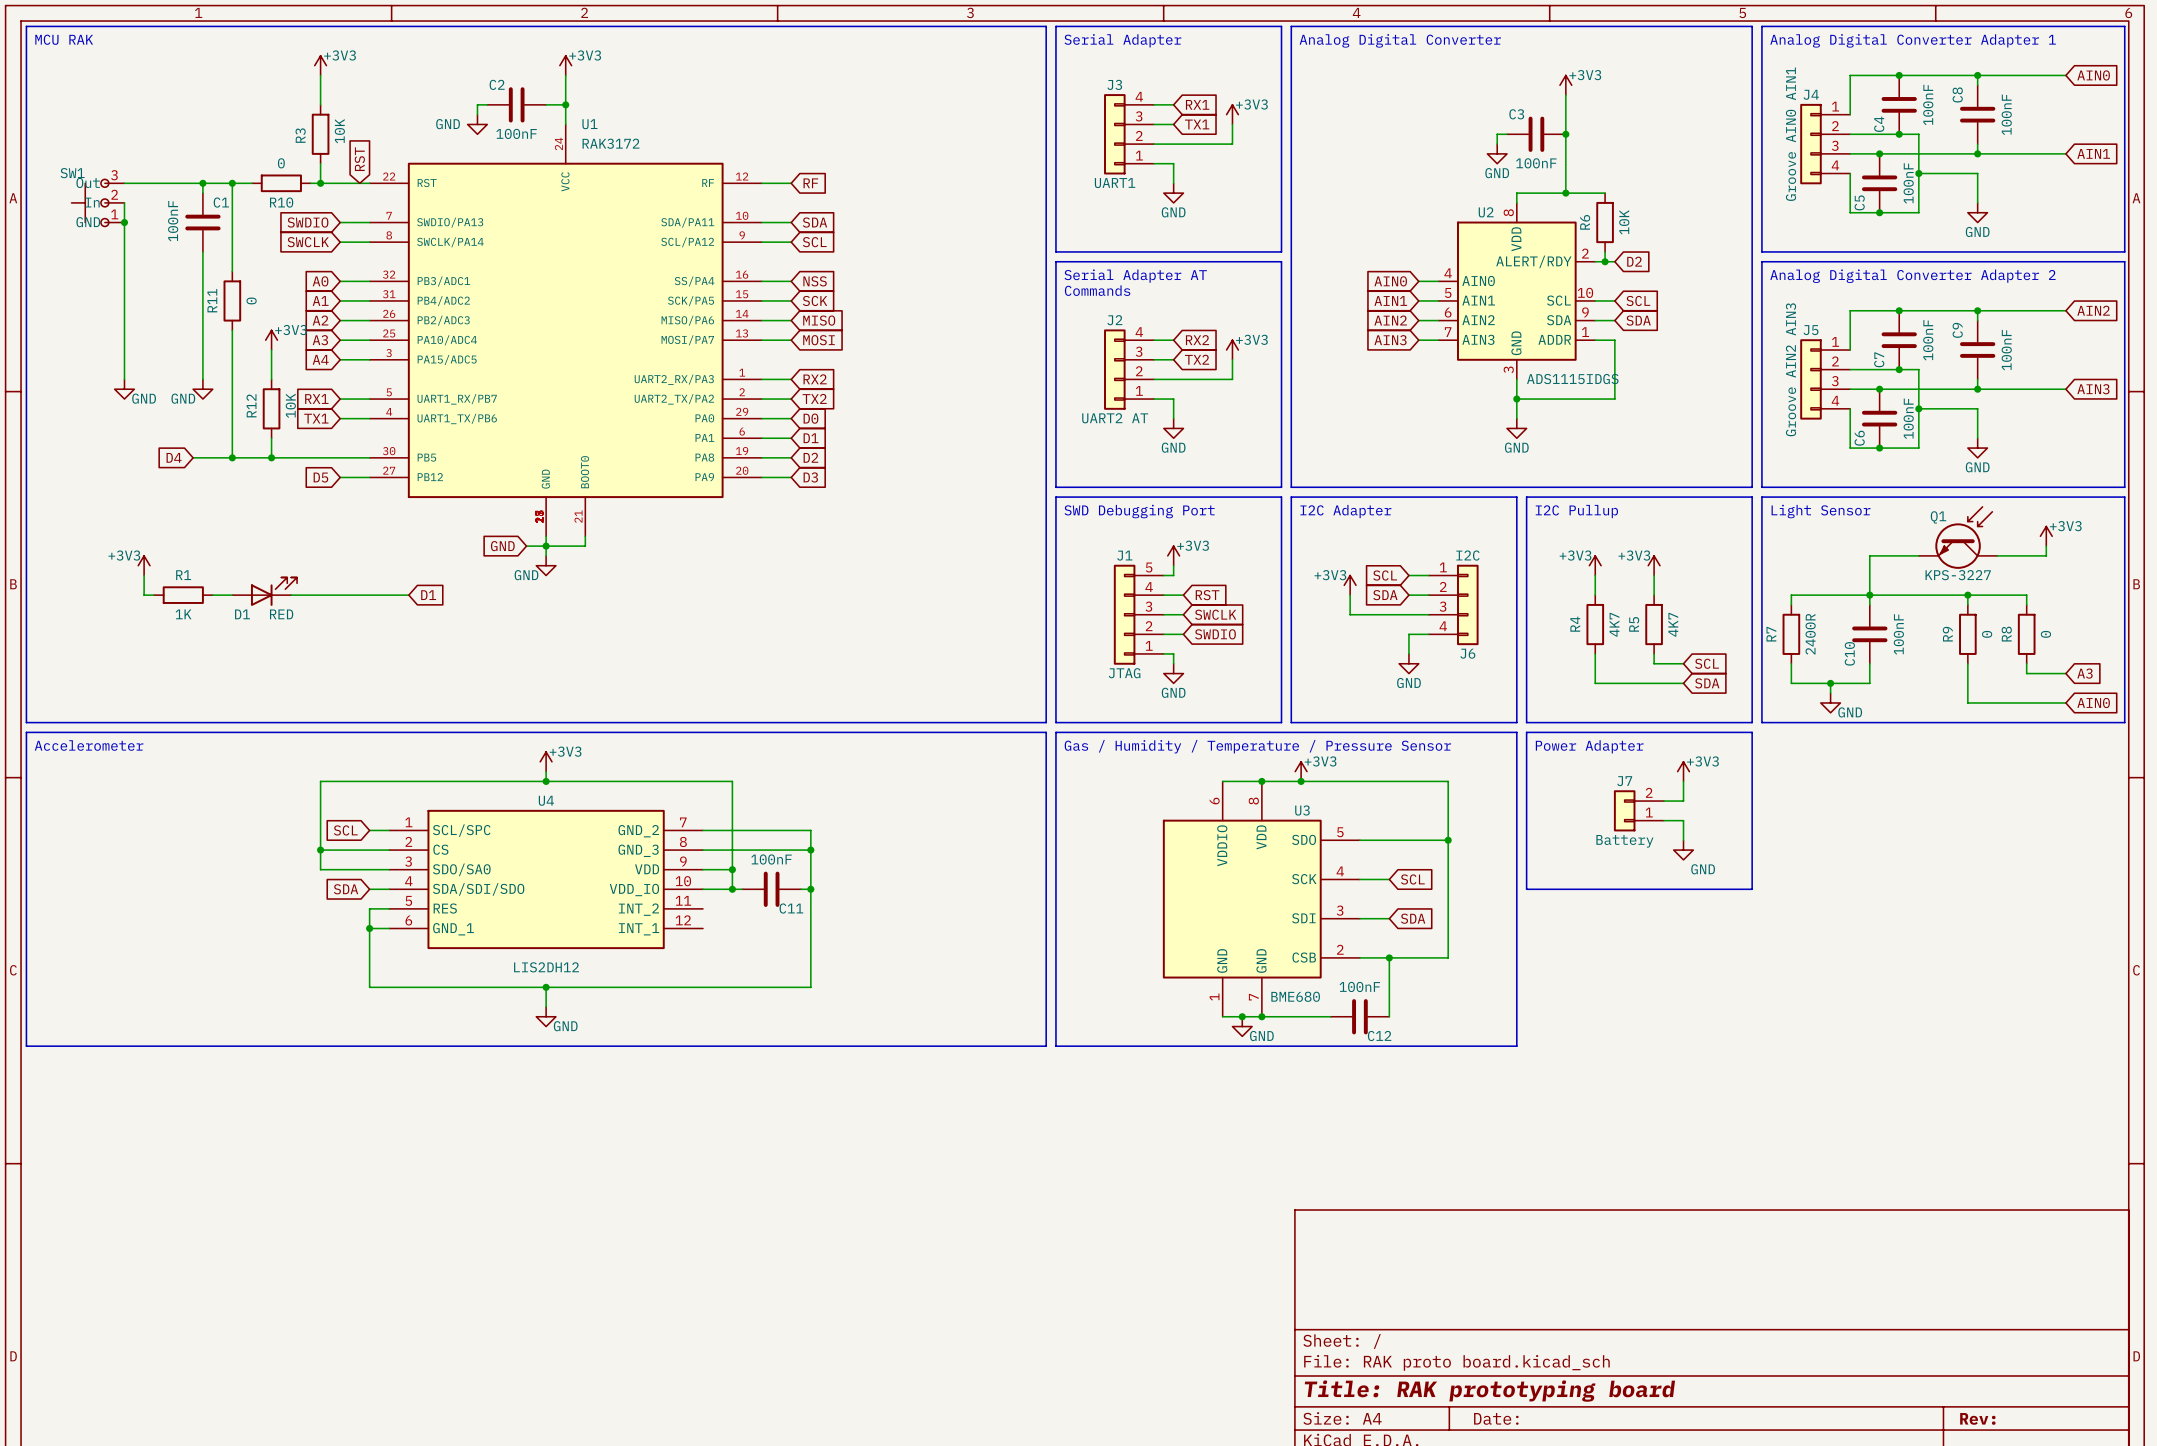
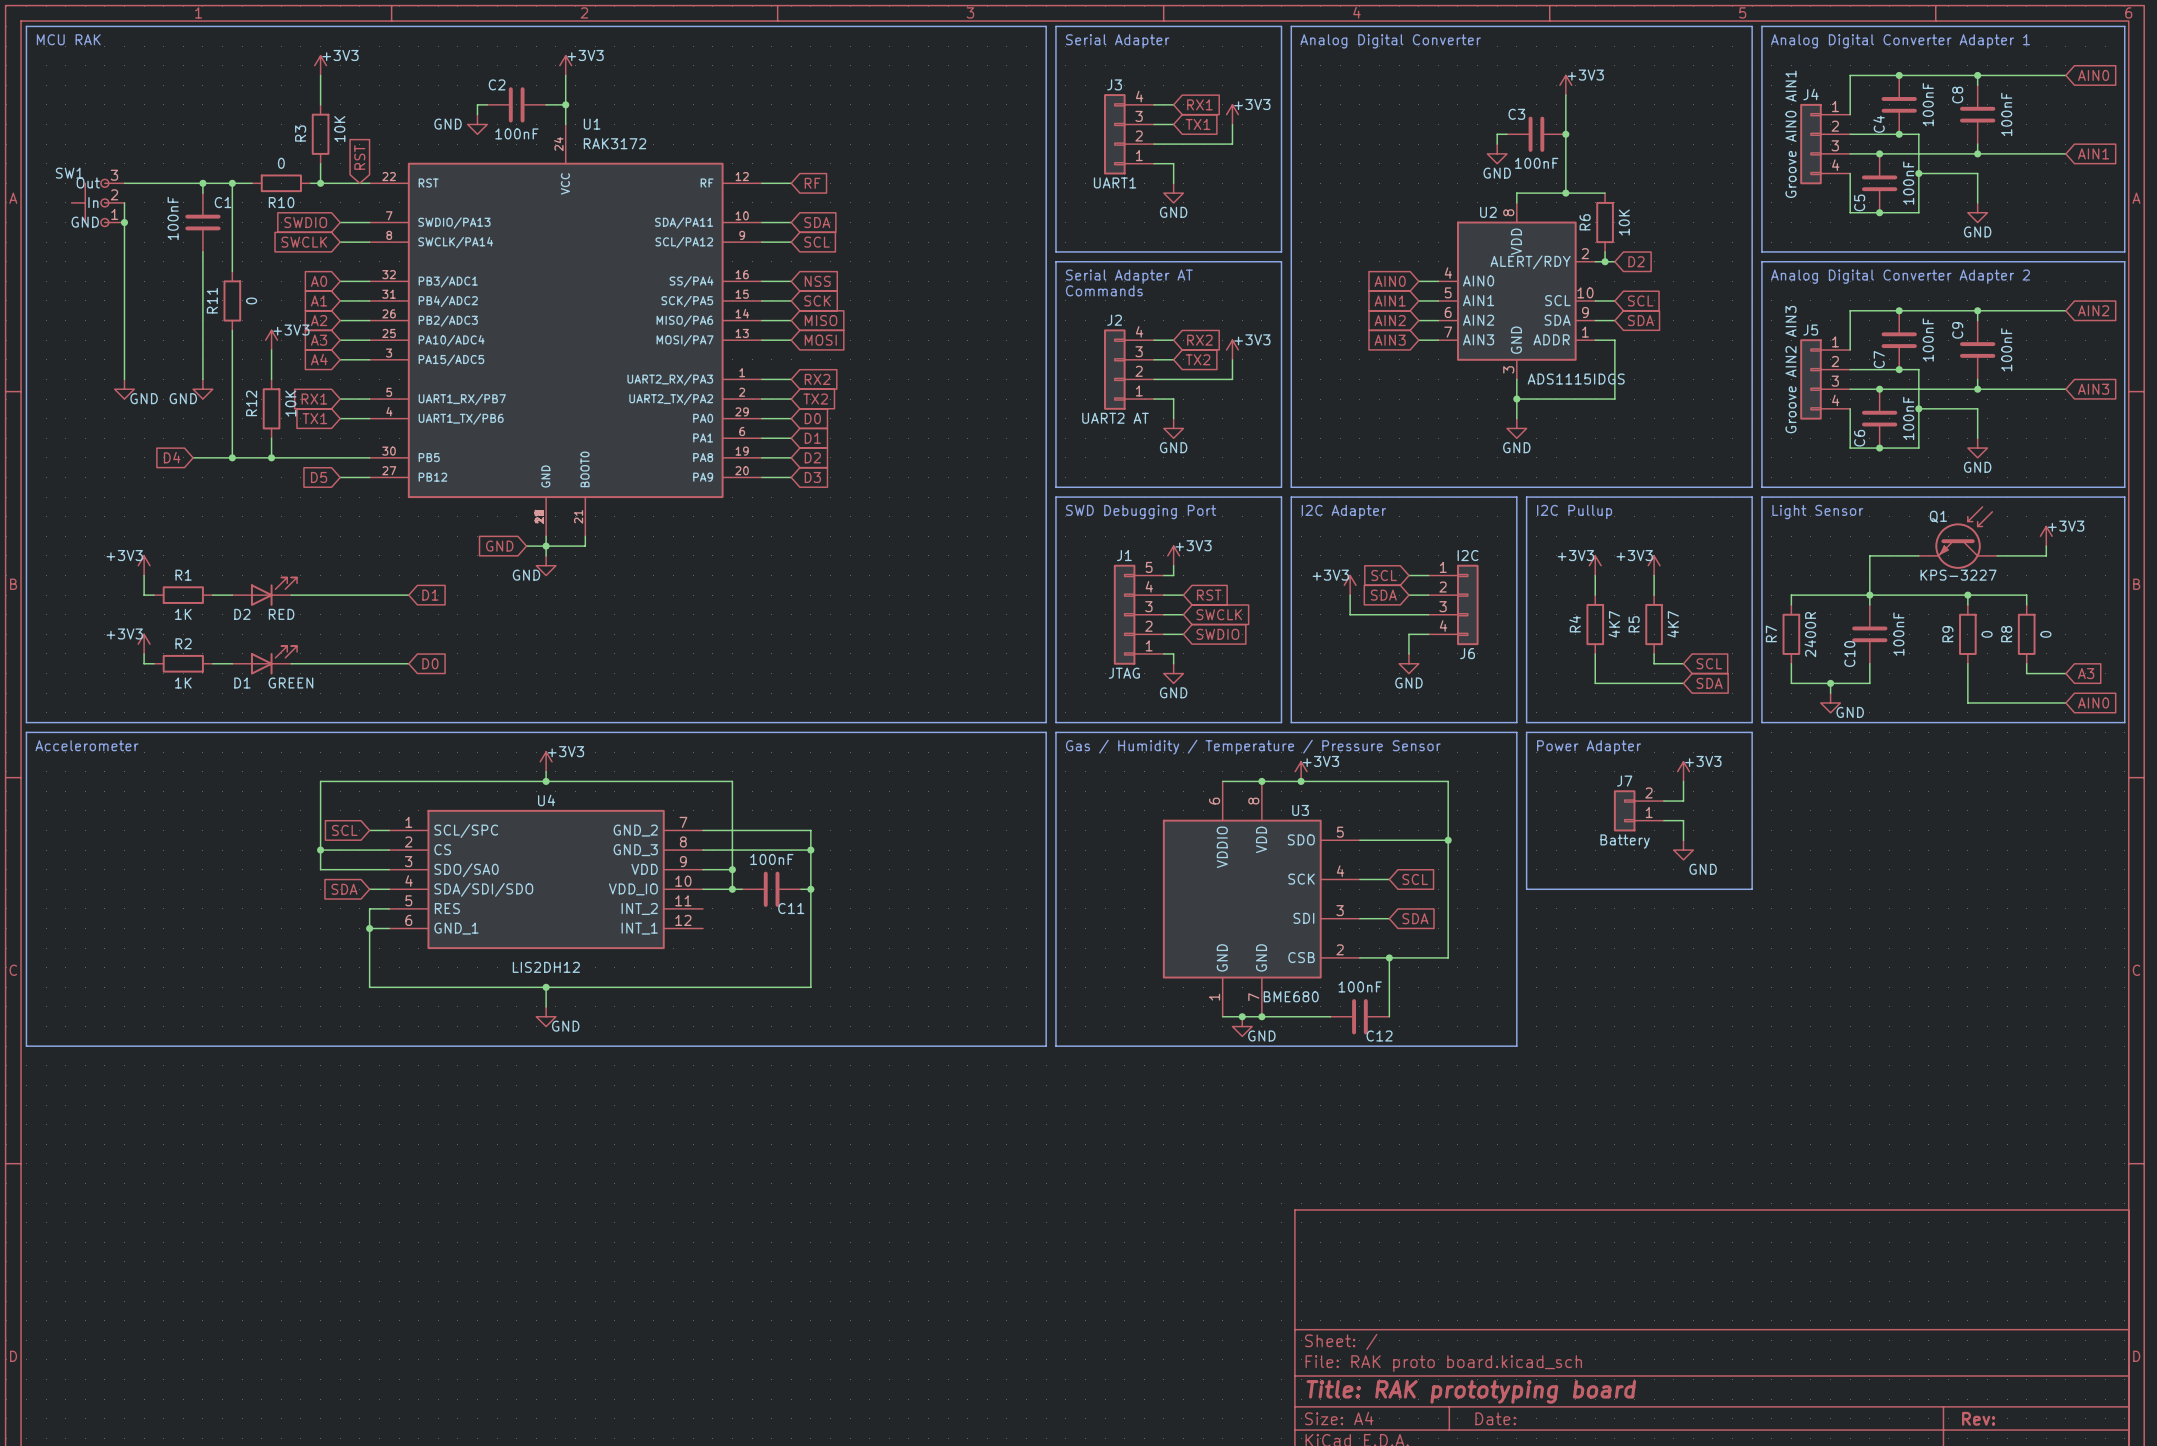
D1 name: D1 (242, 614) -> D2 (242, 614)
power symbol: none -> +3V3 (144, 644)
wire: none -> (144, 653) (144, 663) (153, 663)
D1: none -> GREEN (264, 660)
R2: none -> 1K (183, 663)
wire: none -> (212, 663) (232, 663)
wire: none -> (291, 663) (408, 663)
global label: none -> D0 (430, 663)

